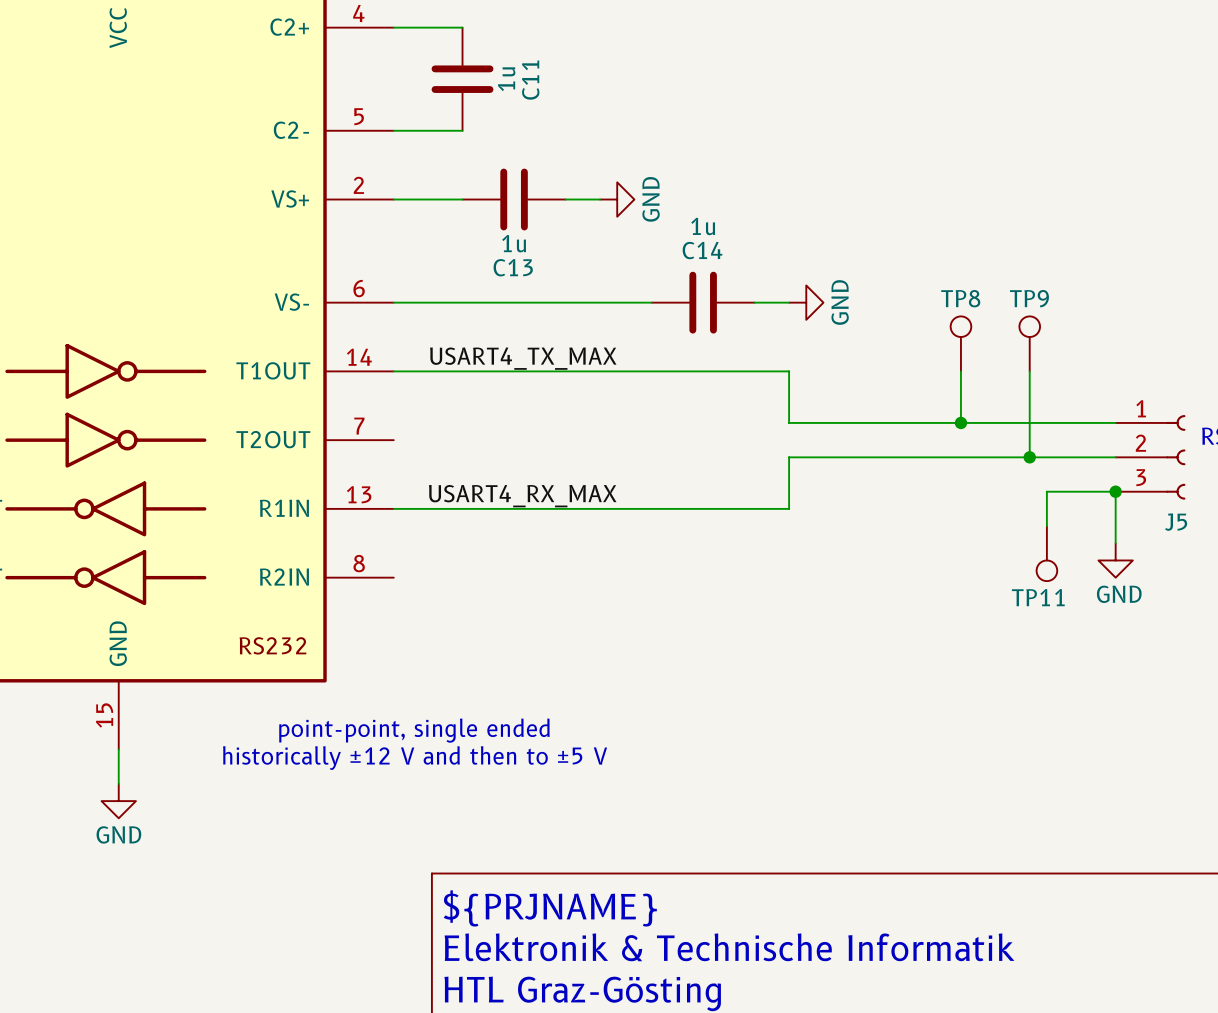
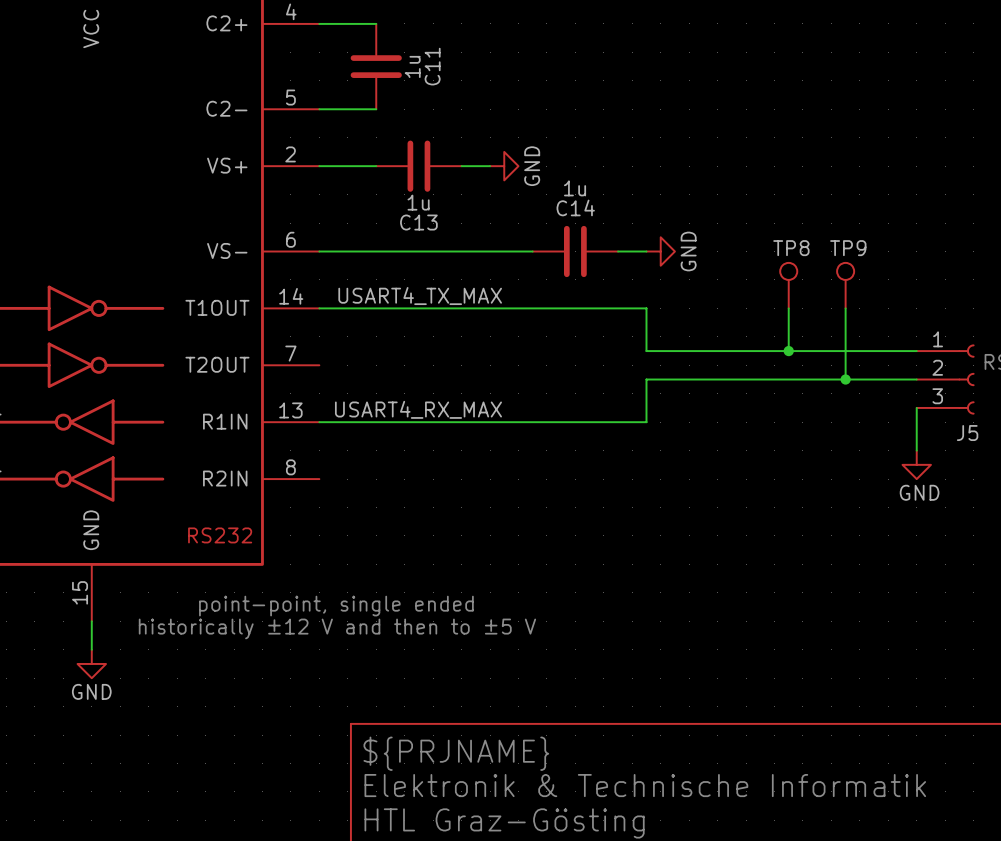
wire: (1115, 491) (1046, 491) (1046, 526) -> none
junction: (1115, 491) -> none
TP11: (1046, 553) -> none

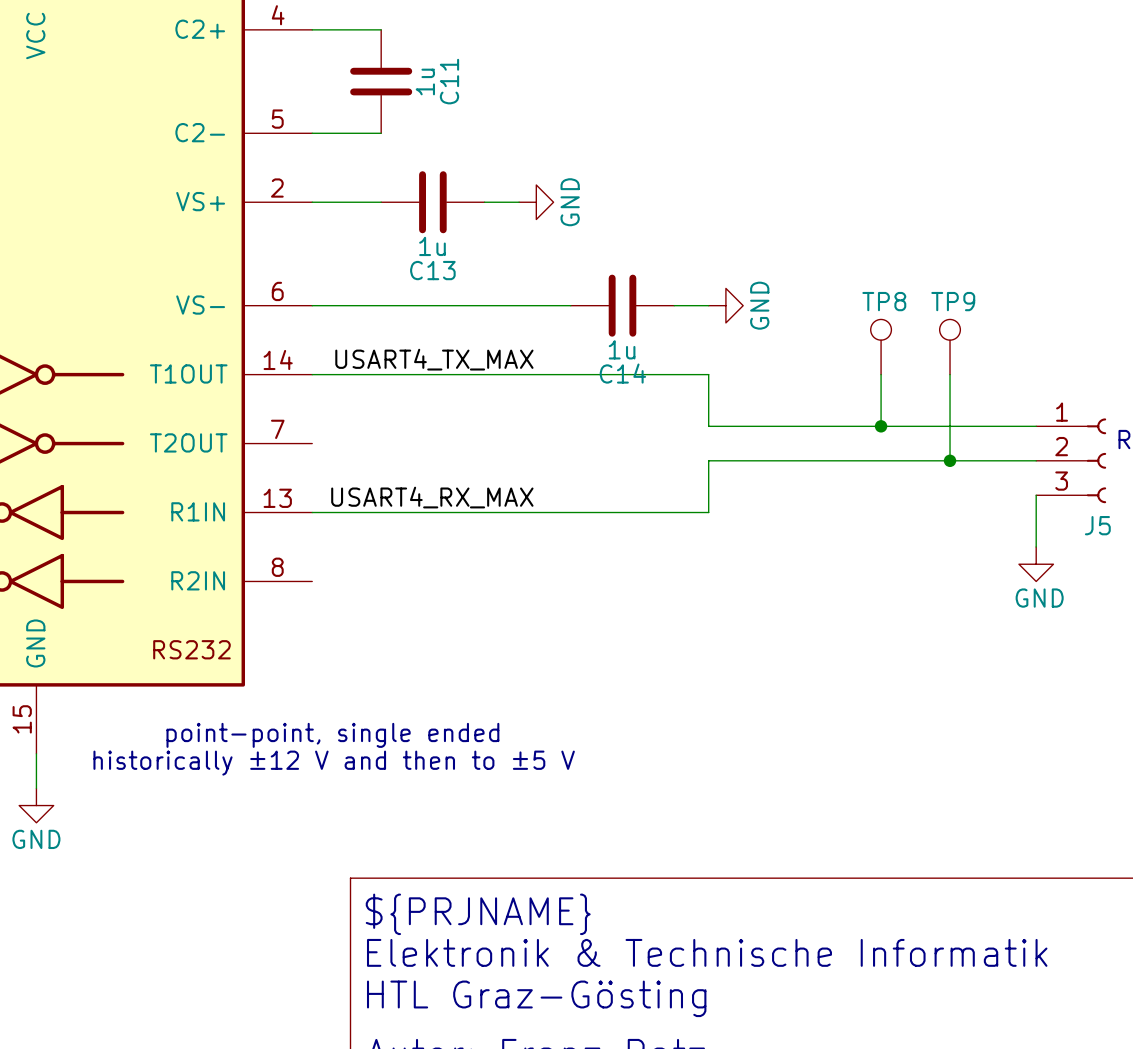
C14 value position: 1u (575, 188) -> 1u (622, 349)
C14 name position: C14 (575, 207) -> C14 (622, 373)

